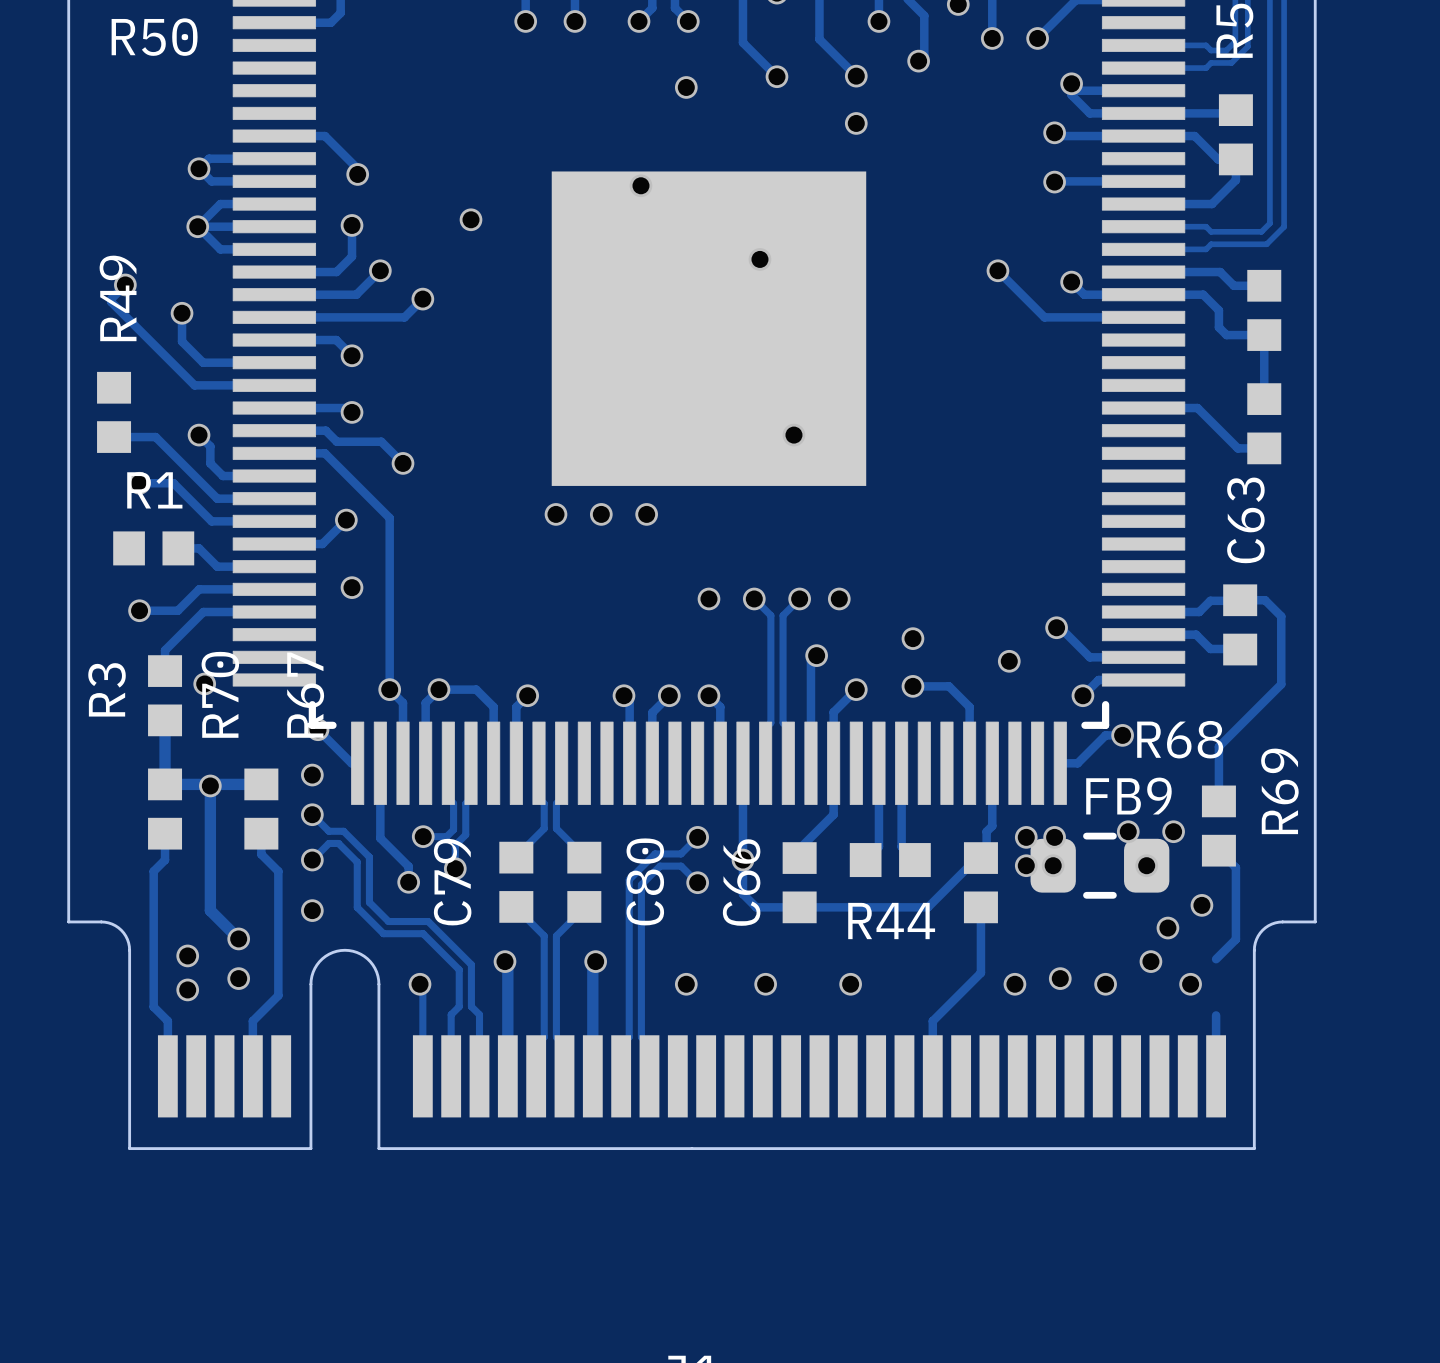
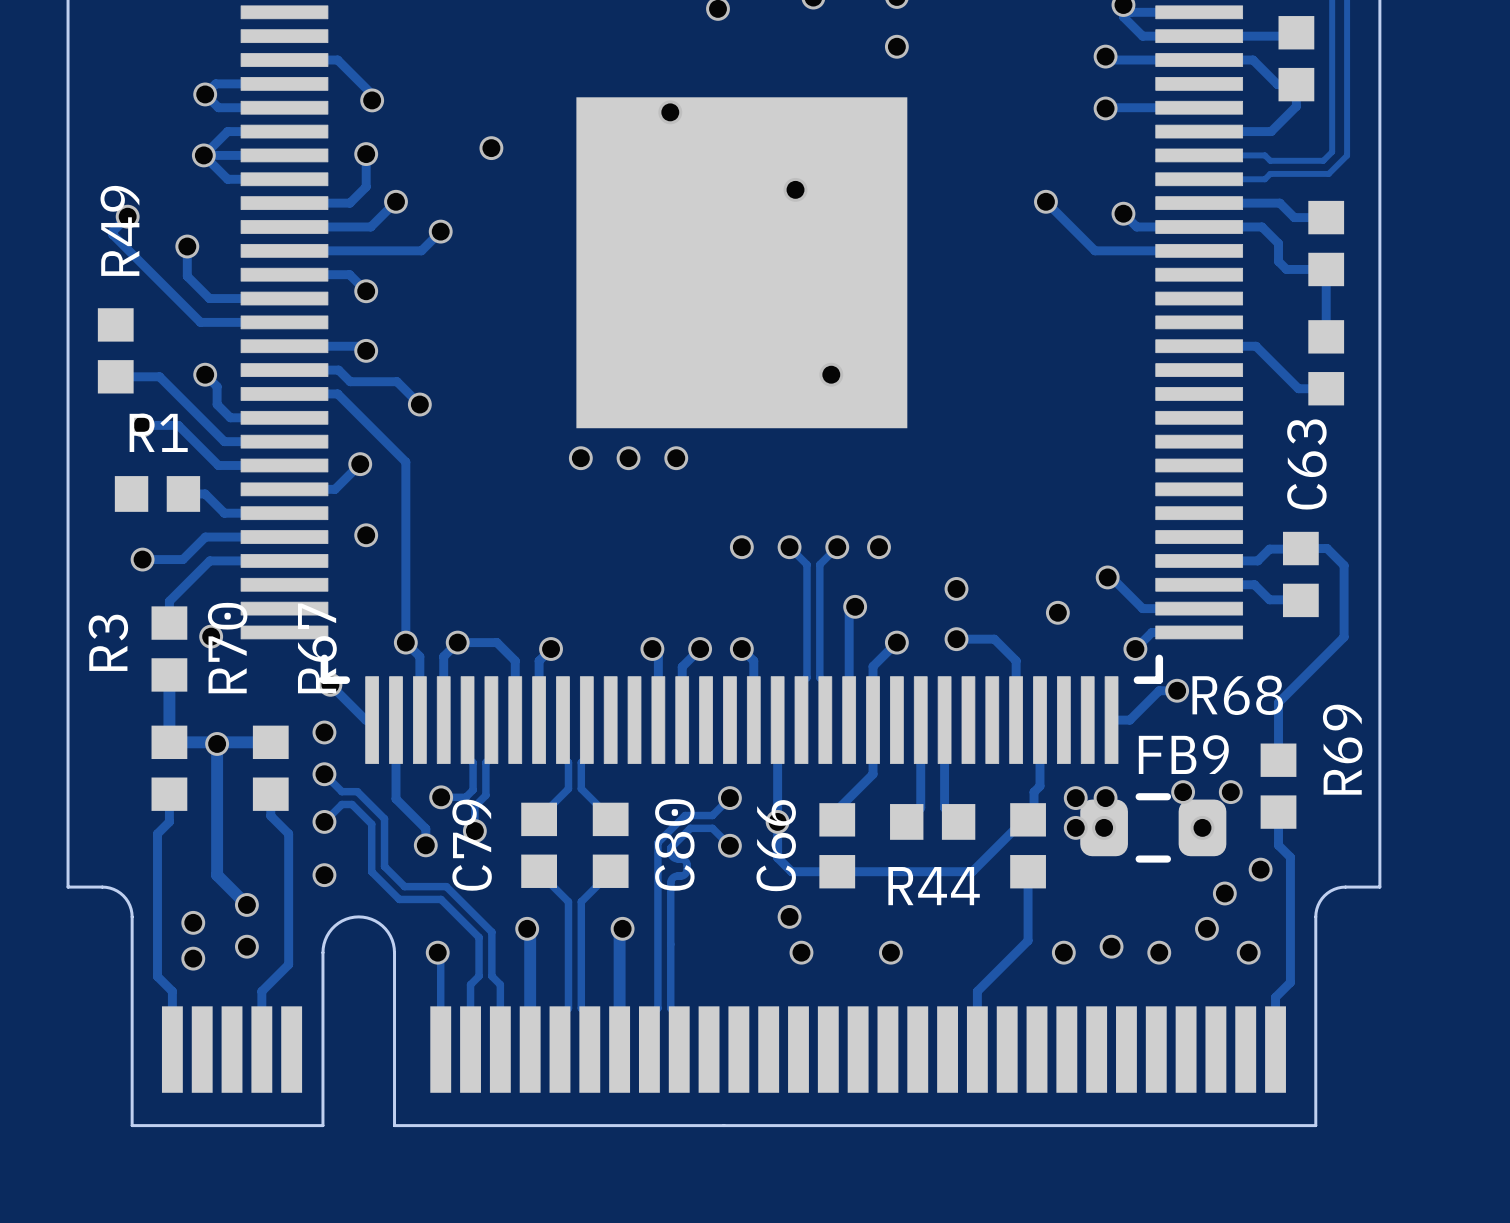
track: (1218, 850) (1235, 867) (1235, 939) (1216, 959) -> (1278, 812) (1278, 845) (1290, 857) (1290, 982) (1275, 997)
track: (641, 888) (641, 918) -> (670, 851) (674, 857) (684, 860) (687, 865) (685, 874) (674, 877) (670, 883)
via position: (686, 984) -> (789, 916)
track: (1216, 1015) (1216, 1026) -> none

